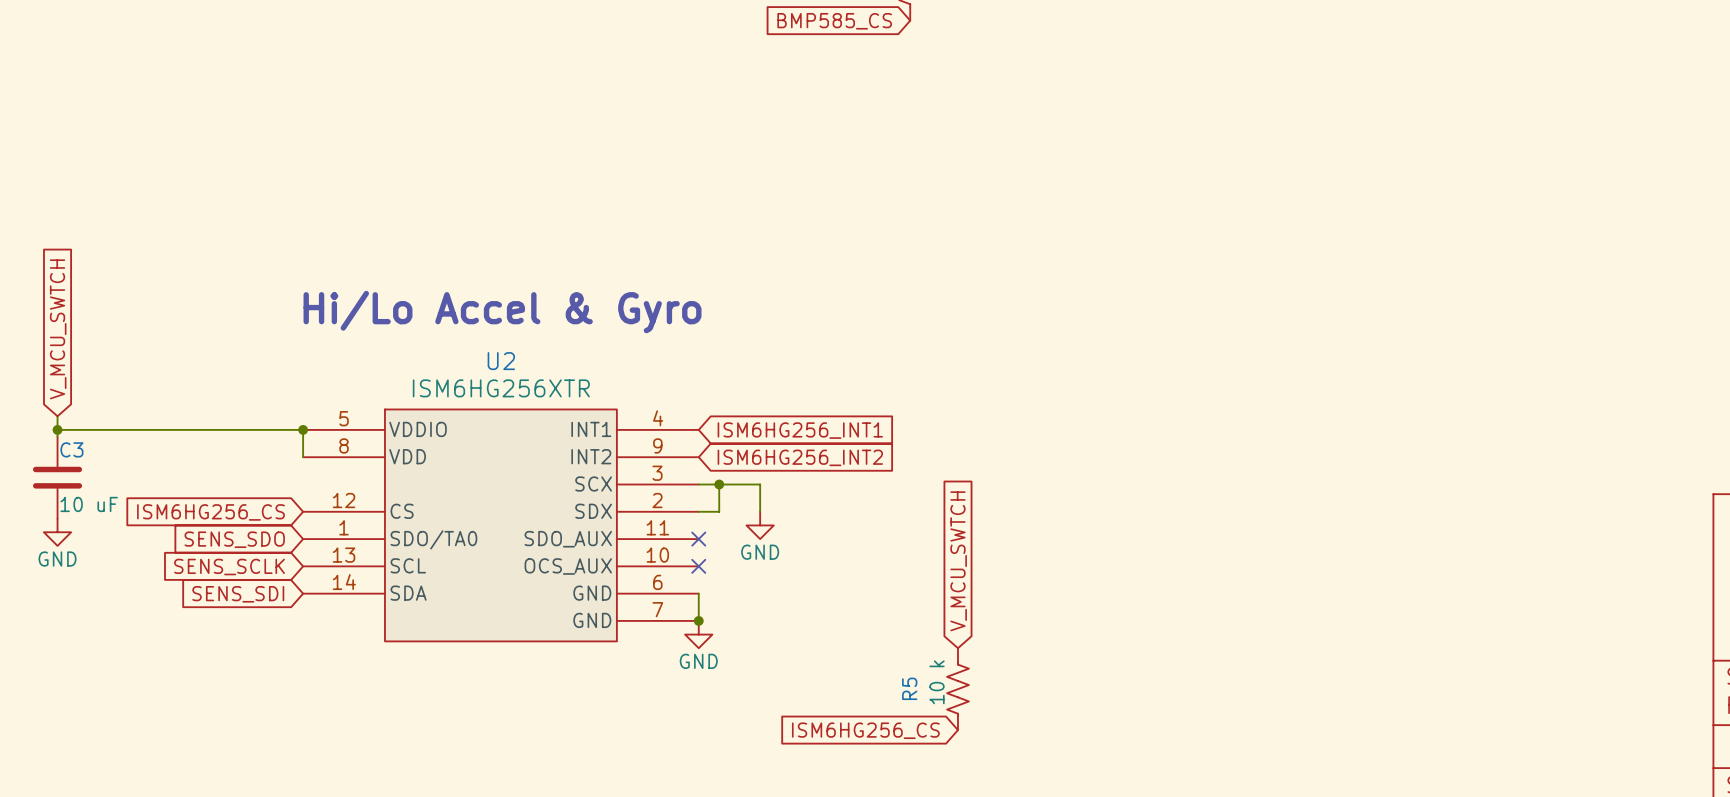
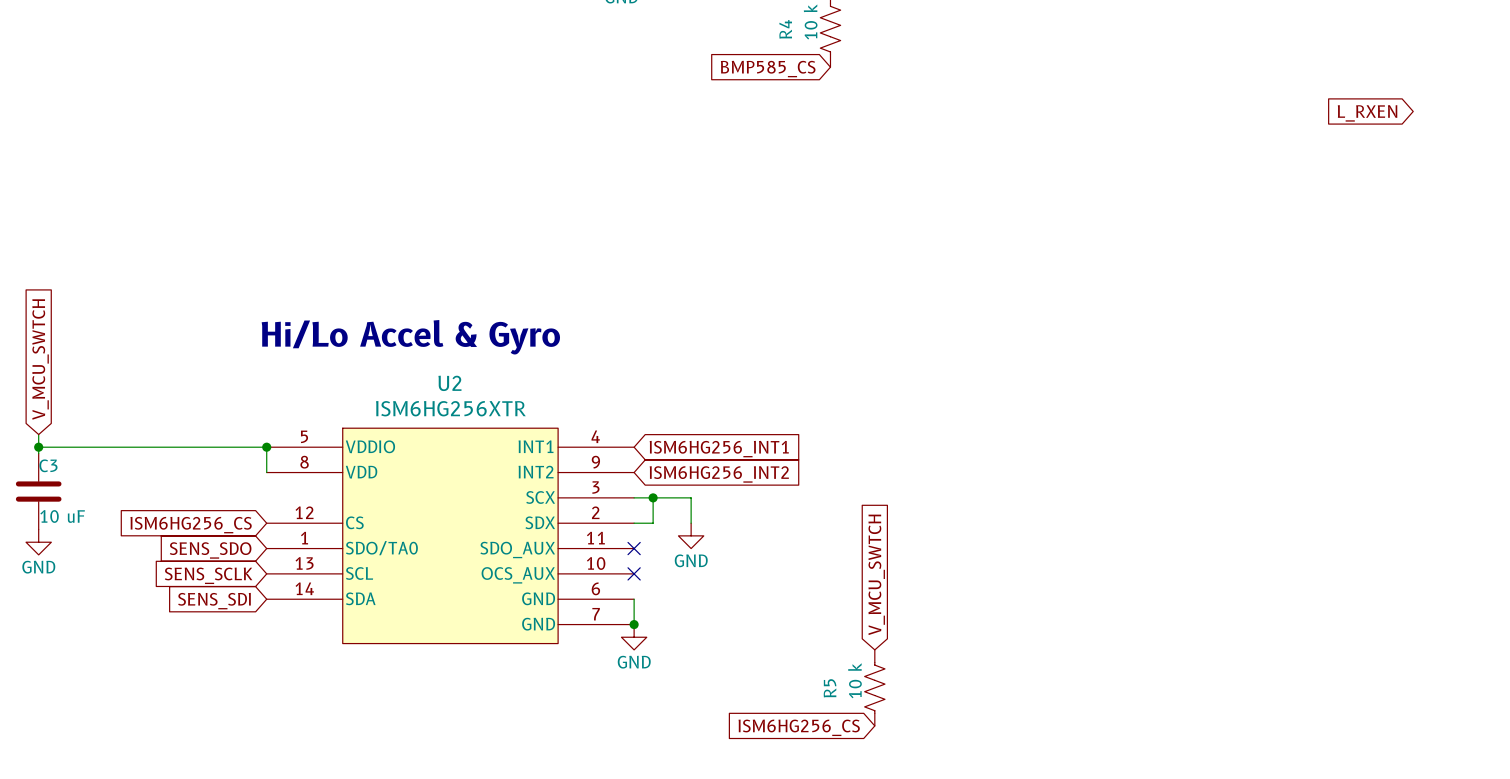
global label: none -> L_RXEN (1367, 113)

